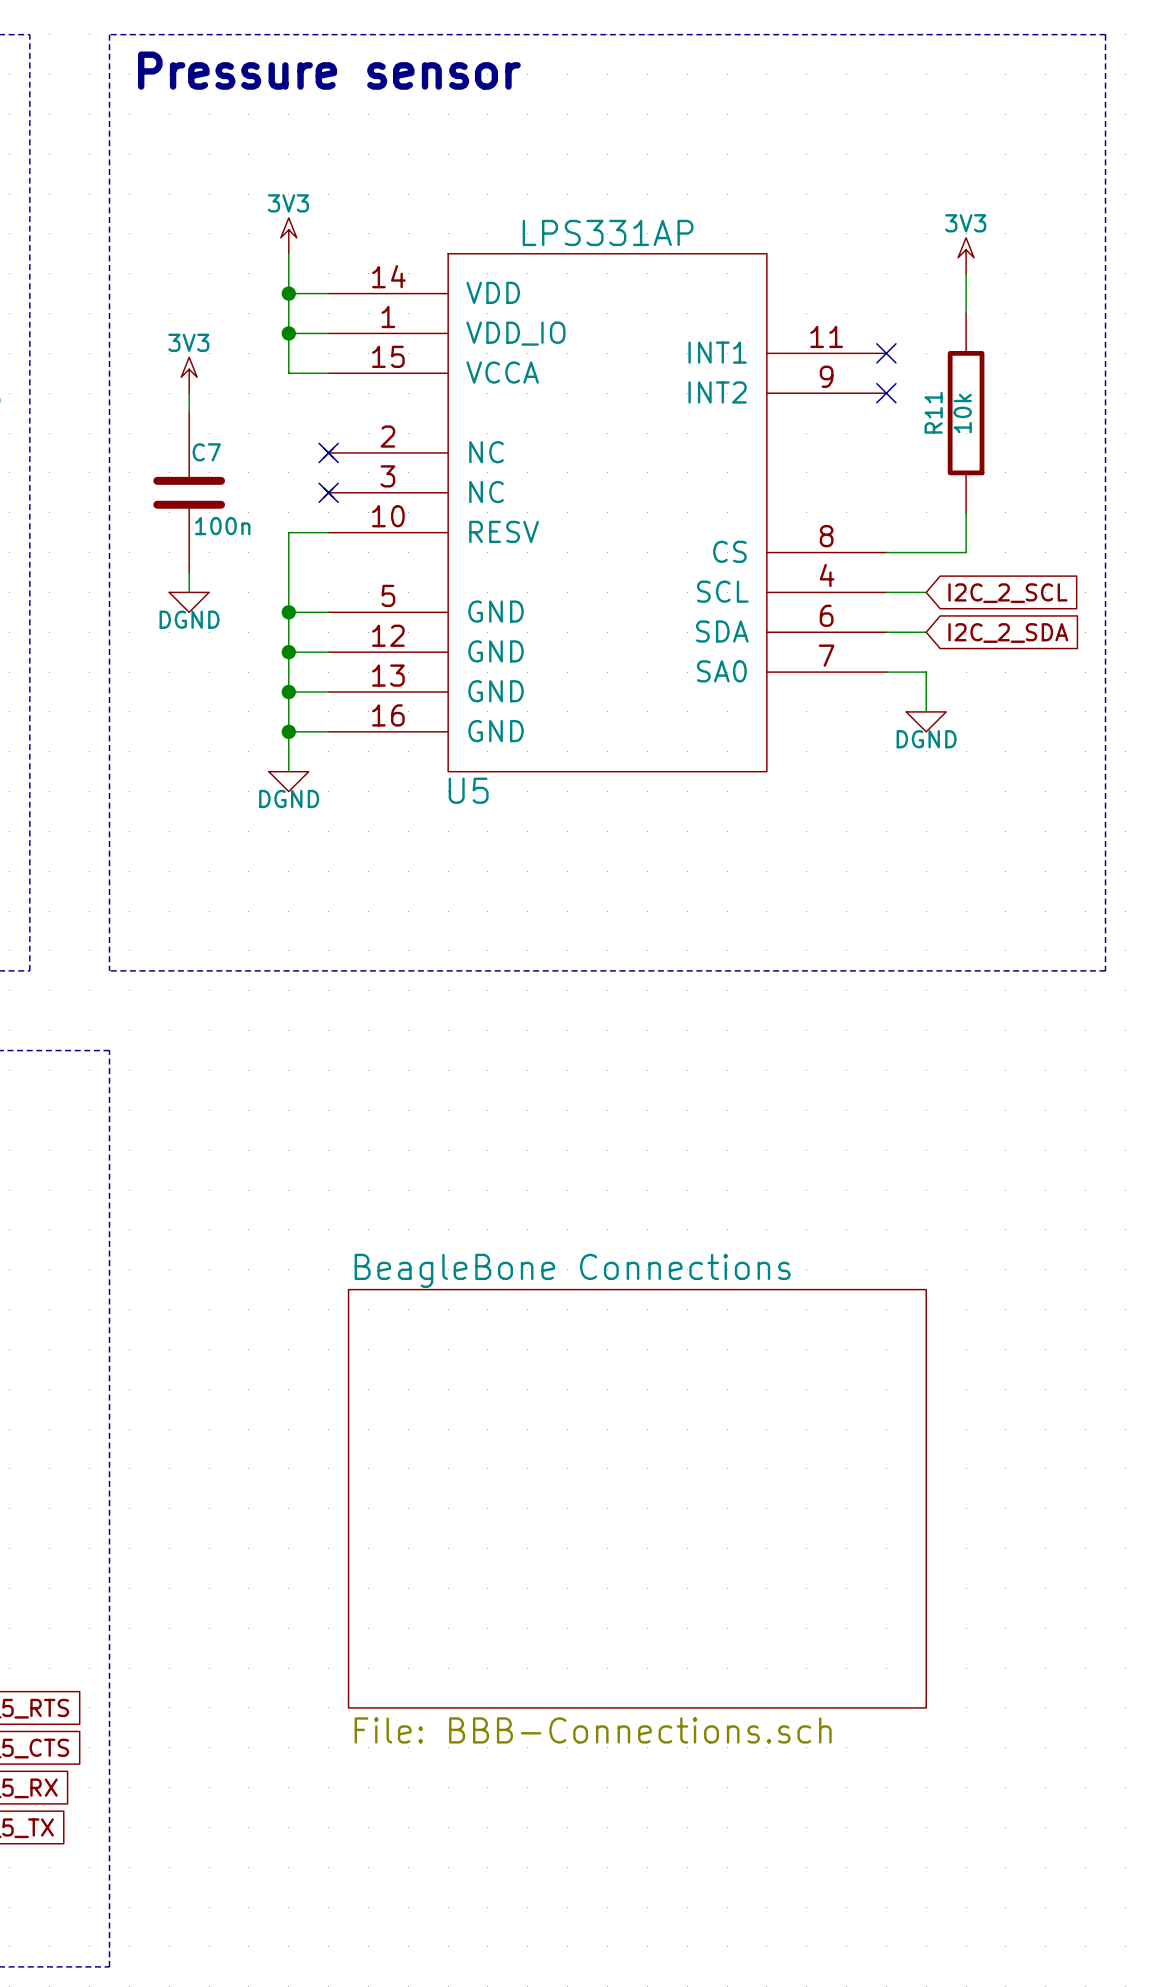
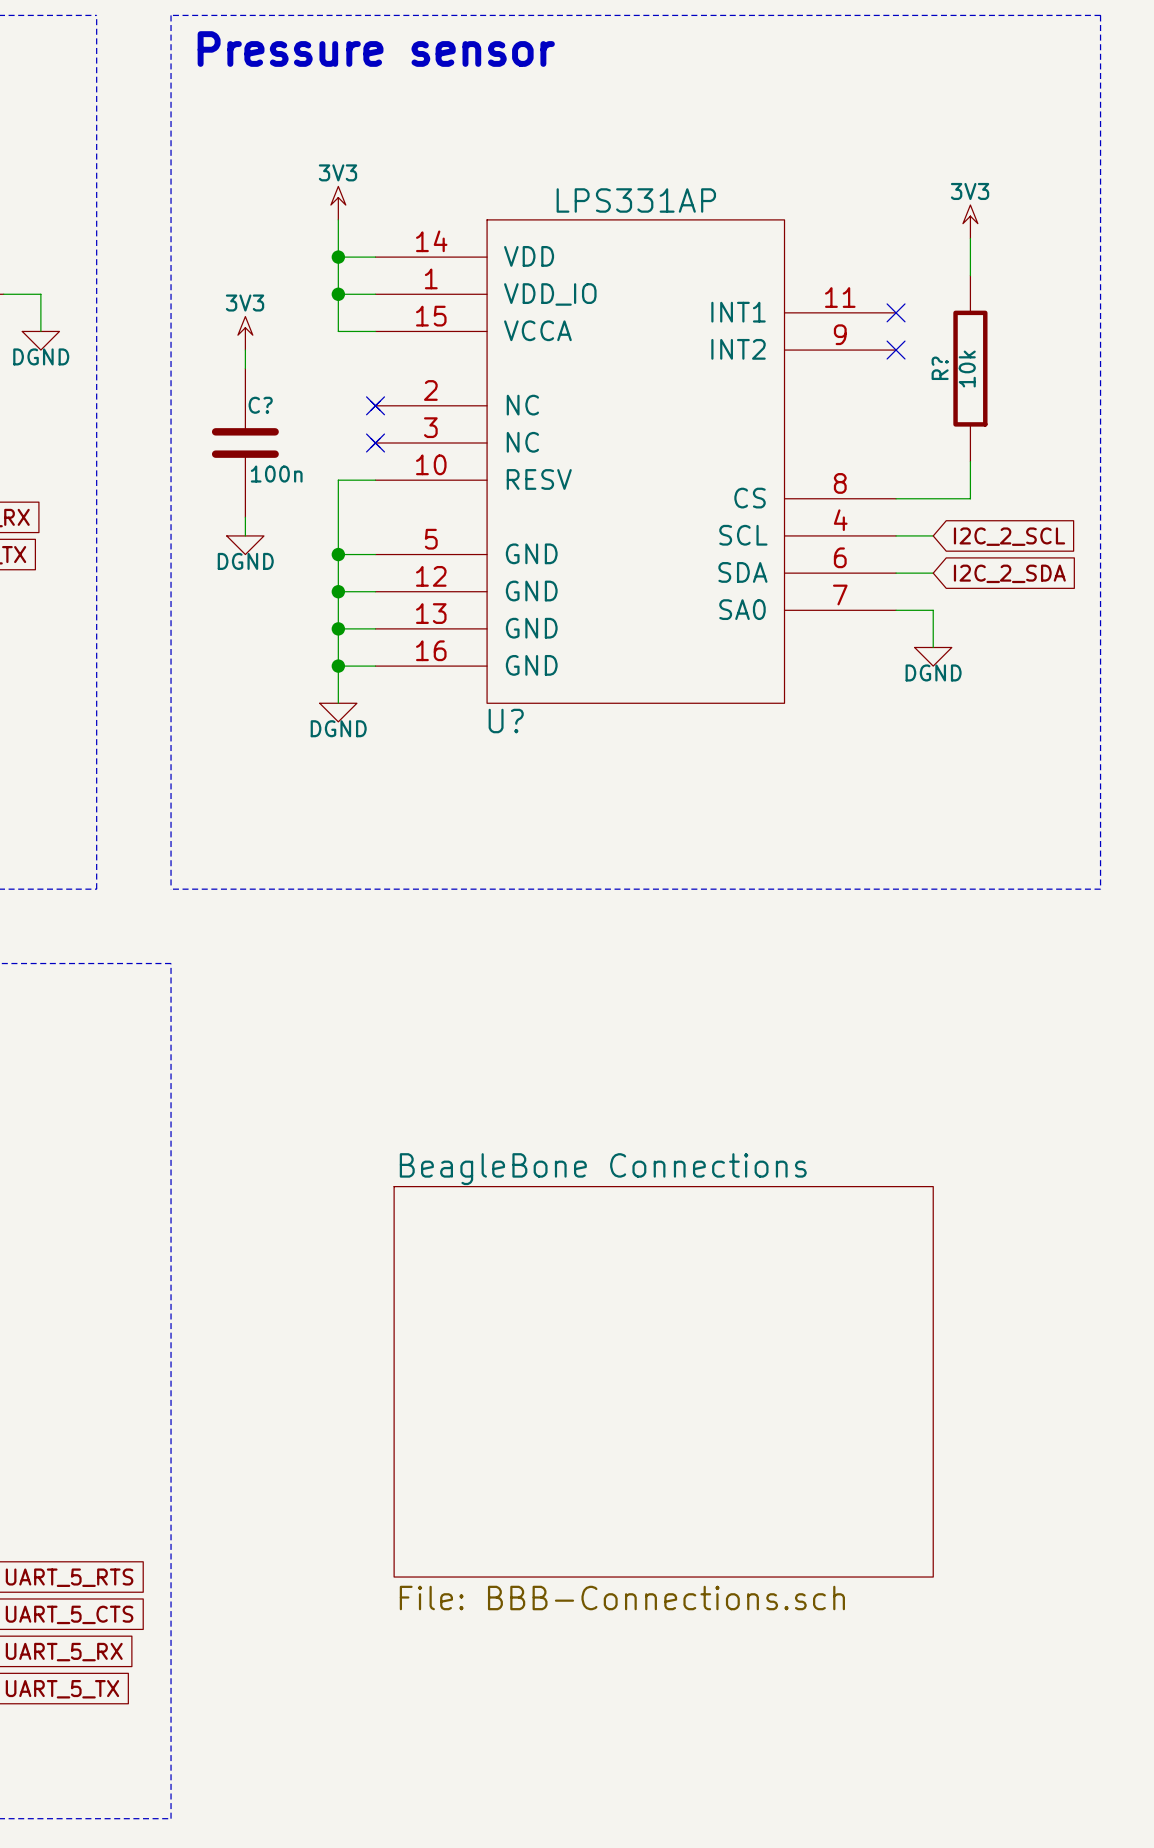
R11 name: R11 (933, 412) -> R? (940, 368)
C7 name: C7 (206, 452) -> C? (260, 405)
U5 name: U5 (468, 790) -> U? (506, 721)

